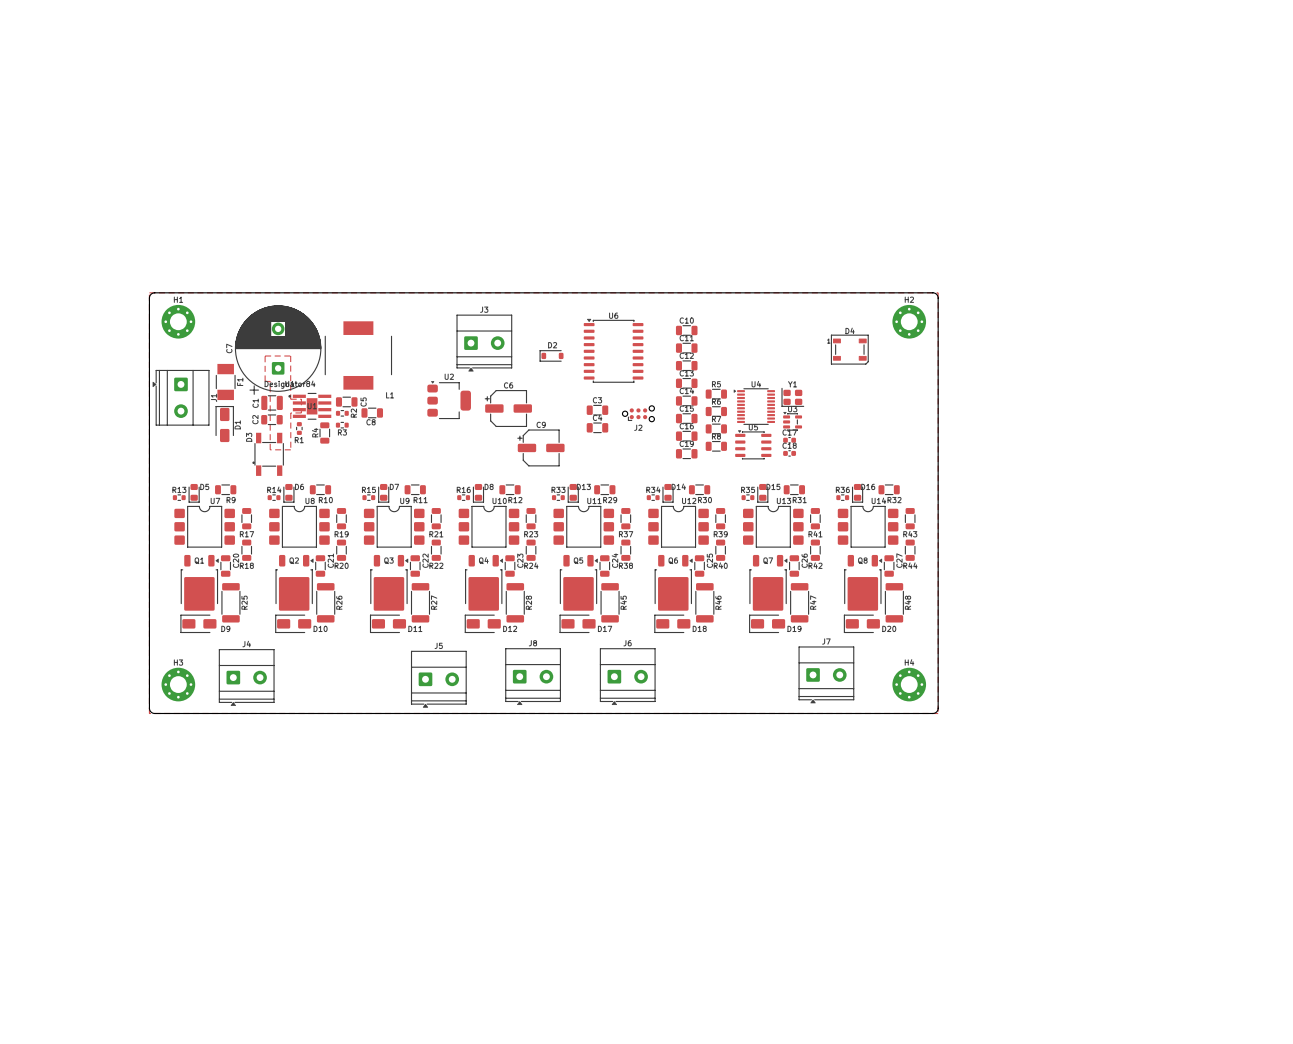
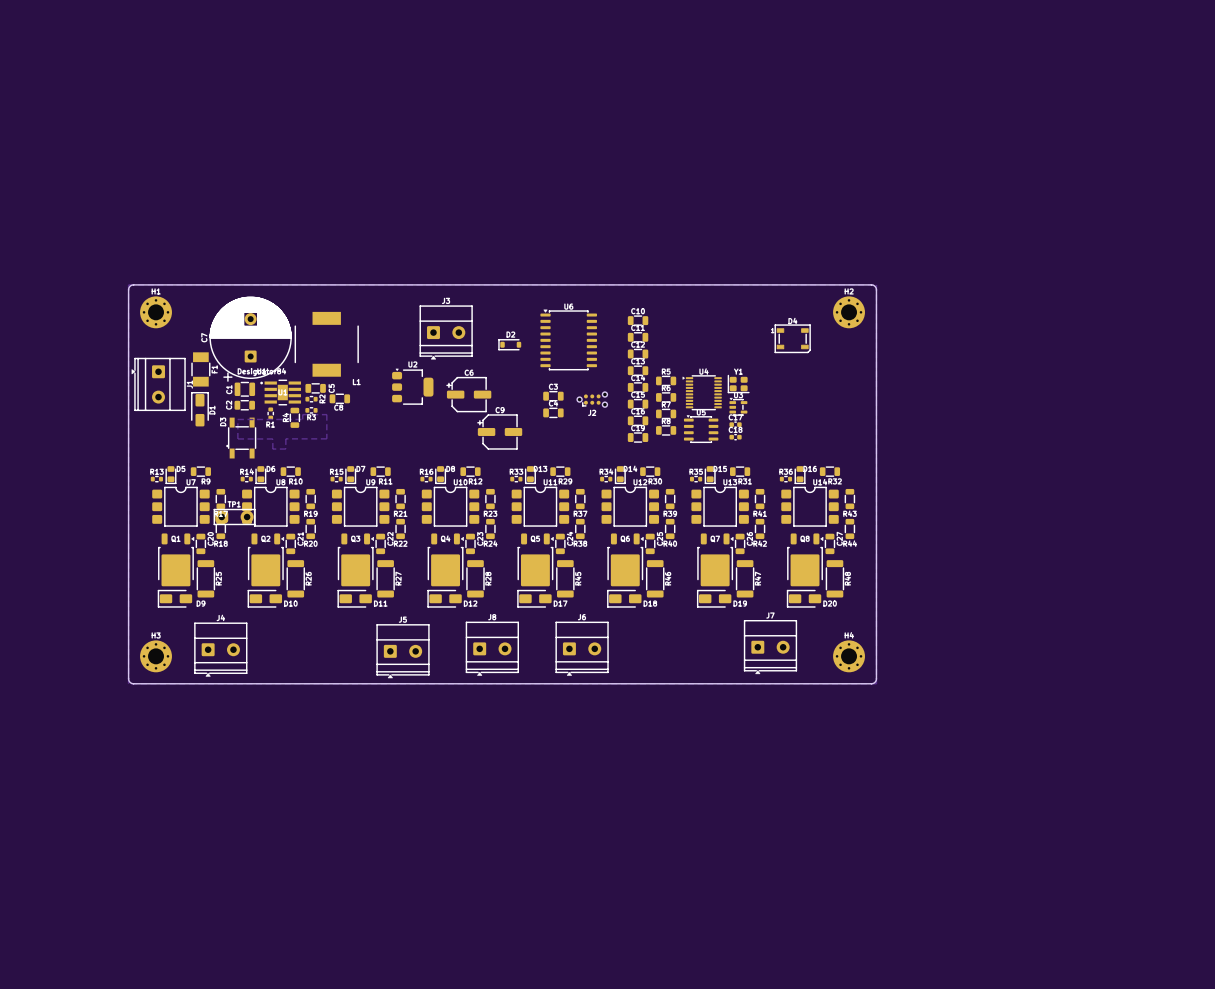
zone outline: (301, 412) (301, 399) (290, 399) (290, 356) (265, 356) (265, 381) (270, 381) (270, 449) (290, 449) (290, 412) (301, 412) -> none
zone outline: none -> (272, 449) (285, 449) (285, 438) (326, 438) (326, 414) (302, 414) (302, 419) (237, 419) (237, 438) (272, 438) (272, 449)
part: none -> (234, 516)

